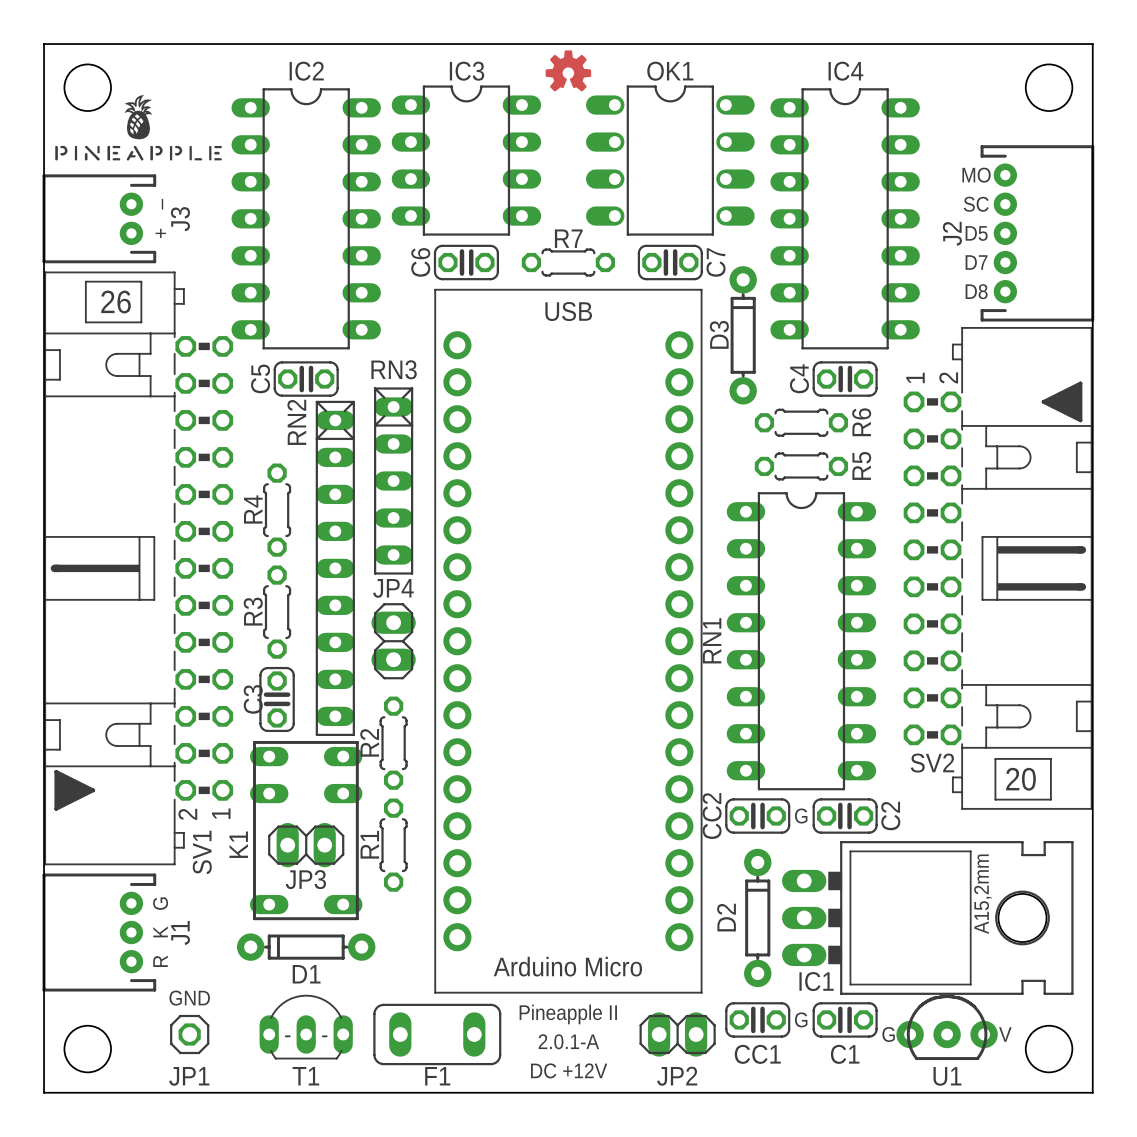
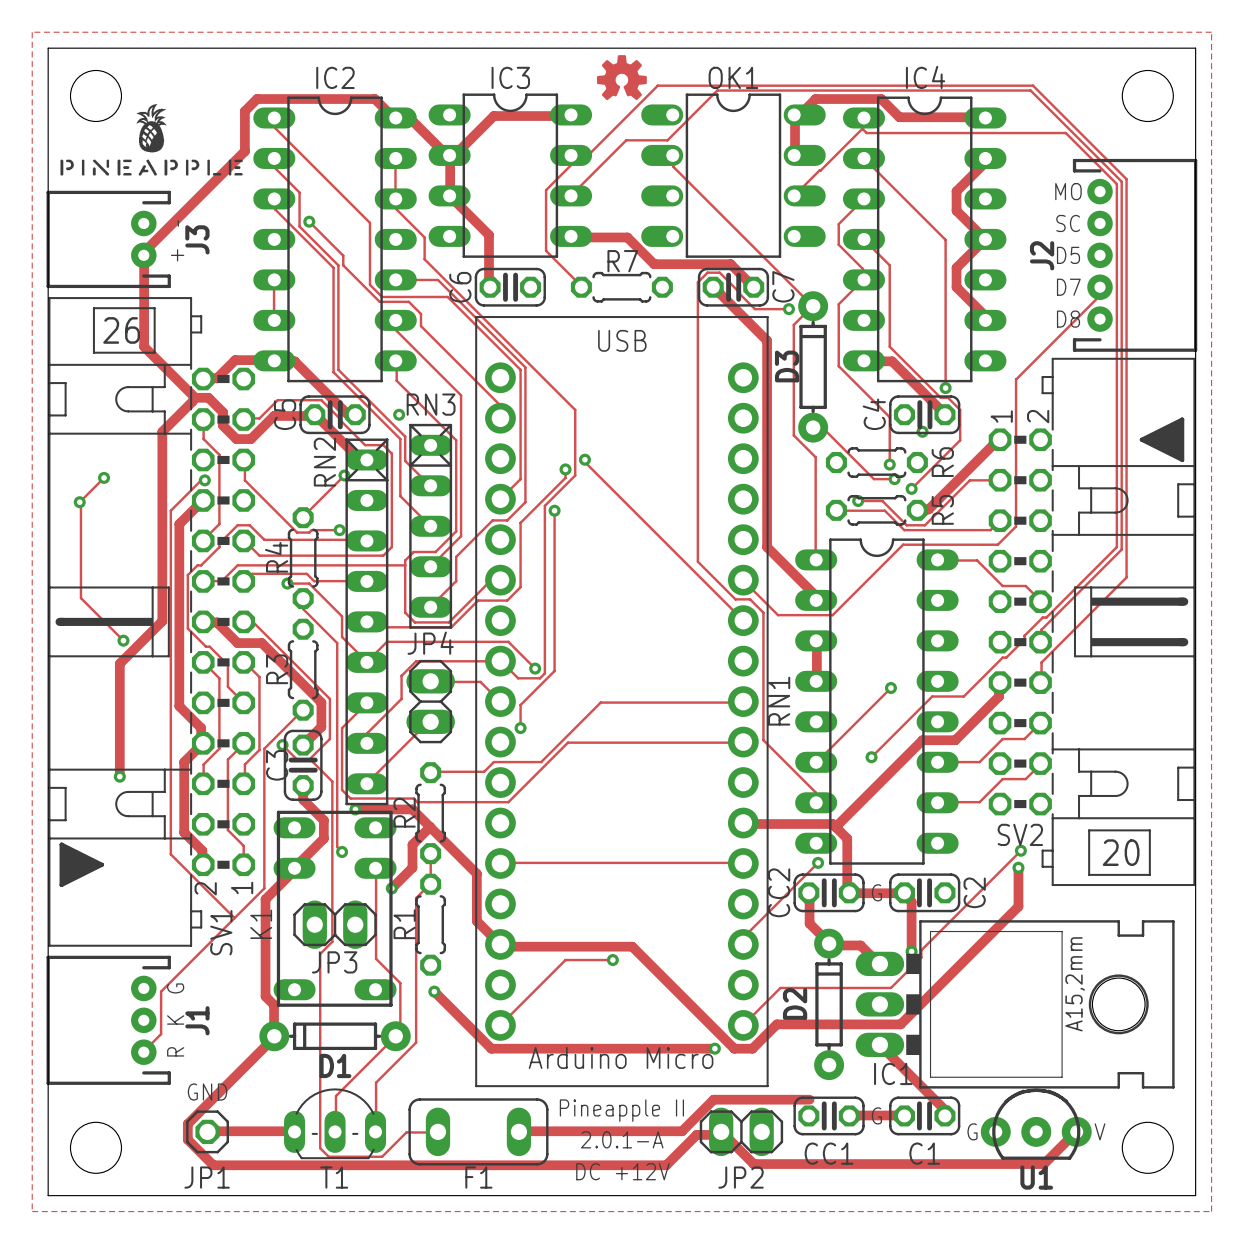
zone outline: none -> (32, 32) (1211, 32) (1211, 1211) (32, 1211) (32, 32)
track: none -> (571, 114) (493, 116) (454, 154) (449, 155)
track: none -> (274, 117) (275, 128) (369, 222) (369, 284) (382, 296) (447, 296) (520, 369) (520, 479) (500, 499)
track: none -> (863, 117) (863, 128) (794, 195)
track: none -> (985, 117) (899, 117) (881, 99) (815, 99) (799, 114) (794, 114) (794, 155)
track: none -> (862, 128) (866, 133) (1065, 133) (1116, 184) (1116, 547) (1046, 617) (1042, 617) (1024, 635) (1024, 639) (1006, 657) (1002, 657) (963, 696) (932, 696) (871, 757)
track: none -> (449, 155) (449, 195) (489, 235) (490, 287)
track: none -> (449, 155) (445, 153) (410, 118) (396, 118) (391, 116) (374, 99) (257, 99) (244, 111) (244, 151) (145, 250) (143, 255) (144, 346) (195, 397)
track: none -> (672, 155) (673, 167) (813, 306) (793, 324) (793, 435) (815, 457) (816, 559)
track: none -> (274, 158) (275, 168) (299, 192) (299, 226) (338, 265) (338, 369) (405, 436) (405, 460) (430, 485)
track: none -> (395, 158) (396, 209) (424, 237) (424, 259) (575, 409) (575, 475) (544, 505) (544, 673) (540, 678) (518, 678) (500, 661) (416, 661) (401, 675) (401, 698) (367, 732) (366, 743)
track: none -> (864, 158) (945, 239) (945, 388)
track: none -> (985, 158) (984, 163) (956, 191) (956, 210) (985, 239) (956, 267) (956, 287) (984, 315) (985, 320)
track: none -> (571, 195) (626, 140) (667, 140) (717, 90) (1030, 90) (1121, 181) (1121, 549) (1041, 629) (1040, 642)
track: none -> (274, 198) (275, 209) (333, 267) (333, 372) (400, 439) (400, 496) (430, 526)
track: none -> (863, 198) (838, 224) (838, 244) (863, 269) (863, 279) (838, 304) (838, 366) (889, 417) (889, 464)
track: none -> (309, 221) (343, 255) (343, 265) (379, 301) (408, 301) (420, 313) (420, 326) (499, 405) (500, 418)
via: none -> (309, 221)
track: none -> (571, 236) (627, 237) (654, 264) (730, 264) (753, 287)
track: none -> (863, 239) (889, 265) (889, 346) (940, 397) (948, 397) (960, 409) (960, 440) (911, 488)
track: none -> (274, 279) (274, 320)
track: none -> (395, 279) (437, 279) (525, 367) (525, 502) (507, 520) (492, 520) (456, 556) (456, 581) (430, 607)
track: none -> (581, 287) (546, 250) (546, 190) (570, 165) (571, 154) (588, 154) (657, 85) (1033, 85) (1126, 179) (1126, 577) (1041, 662) (1040, 682)
track: none -> (713, 287) (767, 340) (767, 547) (815, 595) (816, 600)
track: none -> (1099, 287) (1099, 295) (1016, 379) (1016, 526) (997, 544) (903, 544) (832, 615) (778, 615) (743, 580)
track: none -> (788, 309) (754, 309) (719, 272) (707, 272) (697, 282) (697, 561) (735, 599) (750, 599) (763, 612) (763, 740) (815, 792) (816, 802)
via: none -> (788, 309)
track: none -> (395, 320) (396, 330) (461, 395) (461, 536) (430, 566)
track: none -> (395, 360) (396, 380) (456, 440) (456, 531) (435, 552) (413, 552) (405, 560) (405, 612) (414, 622) (448, 622) (490, 581) (500, 580)
track: none -> (863, 360) (892, 361) (944, 414)
track: none -> (203, 379) (216, 378) (235, 360) (294, 361) (346, 413) (355, 414)
via: none -> (945, 388)
track: none -> (195, 397) (208, 397) (223, 412) (223, 425) (236, 439) (250, 439) (274, 415) (315, 414) (360, 459) (366, 459)
track: none -> (195, 397) (162, 431) (162, 621) (119, 663) (119, 776)
via: none -> (399, 414)
track: none -> (203, 419) (203, 439) (219, 454) (219, 524) (203, 540)
track: none -> (243, 419) (259, 418) (277, 400) (321, 400) (365, 445) (383, 445) (391, 453) (391, 547) (383, 555) (259, 555) (243, 540)
track: none -> (813, 427) (822, 428) (873, 479) (894, 479)
via: none -> (922, 431)
track: none -> (1000, 439) (928, 509) (917, 510)
track: none -> (243, 459) (244, 480) (297, 532) (309, 532) (311, 530) (339, 530)
track: none -> (584, 459) (584, 462) (743, 620)
via: none -> (584, 459)
via: none -> (889, 464)
track: none -> (565, 469) (565, 477) (520, 522) (520, 587) (507, 600) (478, 600) (451, 627) (372, 627) (366, 621)
via: none -> (565, 469)
track: none -> (344, 475) (303, 517)
via: none -> (344, 475)
track: none -> (104, 477) (79, 502) (80, 598) (123, 640)
via: none -> (104, 477)
via: none -> (894, 479)
track: none -> (1000, 480) (969, 480) (924, 525) (906, 525) (882, 501) (858, 501)
track: none -> (204, 480) (201, 480) (170, 510) (170, 854) (234, 918)
via: none -> (204, 480)
via: none -> (911, 488)
track: none -> (203, 500) (179, 524) (179, 706) (201, 728) (203, 743) (184, 762) (184, 832) (202, 850) (203, 864)
via: none -> (858, 501)
via: none -> (79, 502)
track: none -> (554, 510) (554, 671) (520, 705) (520, 728)
via: none -> (554, 510)
track: none -> (836, 510) (884, 510) (904, 530) (990, 530) (1000, 520)
via: none -> (339, 530)
track: none -> (366, 540) (264, 539) (249, 525) (237, 525) (201, 565) (197, 565) (187, 575) (187, 628) (227, 664) (227, 686) (243, 702)
track: none -> (937, 559) (977, 560) (1002, 586) (1025, 586) (1040, 601)
track: none -> (405, 565) (237, 565) (221, 581) (203, 581)
track: none -> (243, 581) (252, 573) (306, 573) (314, 581) (366, 581)
track: none -> (287, 583) (309, 583) (342, 616) (342, 637) (366, 662) (386, 641) (508, 641) (535, 668)
via: none -> (287, 583)
track: none -> (303, 598) (303, 609) (337, 643) (337, 847) (342, 851)
track: none -> (203, 621) (216, 622) (237, 643) (261, 643) (321, 702) (321, 726) (303, 745)
track: none -> (243, 621) (253, 622) (329, 698) (329, 739) (309, 759) (297, 759) (282, 745)
via: none -> (123, 640)
track: none -> (816, 640) (816, 681)
track: none -> (203, 662) (219, 678) (219, 748) (203, 764) (203, 783)
track: none -> (243, 662) (259, 677) (259, 749) (244, 764) (243, 783)
via: none -> (535, 668)
track: none -> (430, 681) (480, 681) (500, 701)
track: none -> (1000, 682) (999, 696) (955, 740) (922, 740) (835, 827)
track: none -> (890, 688) (816, 762)
via: none -> (890, 688)
track: none -> (743, 701) (600, 702) (541, 762) (493, 762) (484, 771) (430, 772)
track: none -> (366, 702) (342, 728) (342, 790) (350, 798) (413, 798) (417, 802) (508, 802) (567, 742) (743, 742)
track: none -> (303, 710) (264, 748) (264, 888) (161, 991) (161, 1034) (143, 1052)
track: none -> (430, 721) (429, 720) (366, 783)
track: none -> (1040, 723) (1024, 739) (1002, 739) (979, 762) (937, 762)
via: none -> (520, 728)
track: none -> (243, 743) (227, 759) (227, 830) (243, 845) (243, 864)
via: none -> (282, 745)
via: none -> (871, 757)
track: none -> (309, 759) (332, 781) (332, 941) (320, 953) (320, 1148) (328, 1156) (382, 1156) (406, 1132) (437, 1131)
track: none -> (1040, 763) (1025, 779) (1002, 779) (979, 802) (937, 802)
via: none -> (119, 776)
track: none -> (303, 785) (303, 799) (323, 820) (323, 838) (265, 899) (265, 996) (274, 1004) (274, 1036) (187, 1123) (187, 1139) (213, 1165) (666, 1165) (696, 1134) (717, 1134) (721, 1131) (753, 1164) (1043, 1164) (1076, 1131)
track: none -> (355, 809) (412, 809) (476, 873) (476, 921) (499, 944) (504, 946) (632, 946) (734, 1048) (752, 1048) (776, 1024) (900, 1024) (1018, 906) (1018, 867)
via: none -> (355, 809)
track: none -> (743, 823) (832, 824) (847, 838) (847, 888) (849, 893) (904, 892) (911, 901) (911, 951)
track: none -> (430, 827) (412, 844) (412, 867) (391, 888)
track: none -> (1020, 850) (921, 950) (921, 957) (890, 987) (780, 987) (743, 1025)
via: none -> (1020, 850)
via: none -> (342, 851)
track: none -> (430, 853) (430, 884) (416, 898) (416, 1042) (376, 1082) (375, 1131)
track: none -> (818, 862) (744, 936) (743, 944)
via: none -> (818, 862)
track: none -> (500, 863) (743, 863)
track: none -> (375, 868) (376, 958) (400, 983) (400, 1031) (335, 1096) (335, 1131)
via: none -> (1018, 867)
via: none -> (391, 888)
track: none -> (808, 892) (809, 923) (829, 943) (833, 945) (860, 945) (879, 963)
via: none -> (911, 951)
track: none -> (612, 960) (565, 960) (500, 1025)
via: none -> (612, 960)
track: none -> (434, 991) (491, 1048) (714, 1048)
via: none -> (434, 991)
track: none -> (880, 1045) (944, 1109) (944, 1115)
via: none -> (714, 1048)
track: none -> (809, 1099) (713, 1099) (682, 1131) (518, 1131)
track: none -> (849, 1115) (904, 1115)
track: none -> (207, 1131) (294, 1131)

